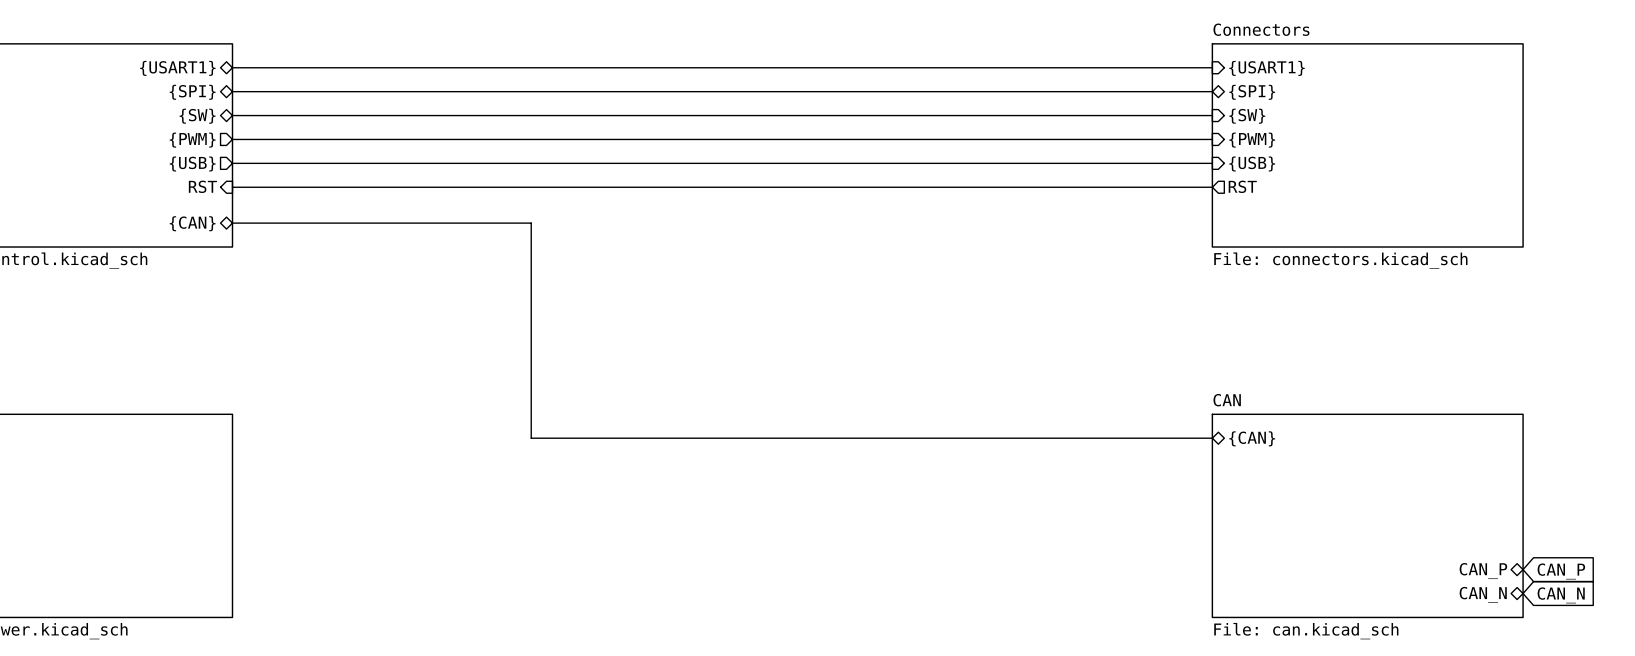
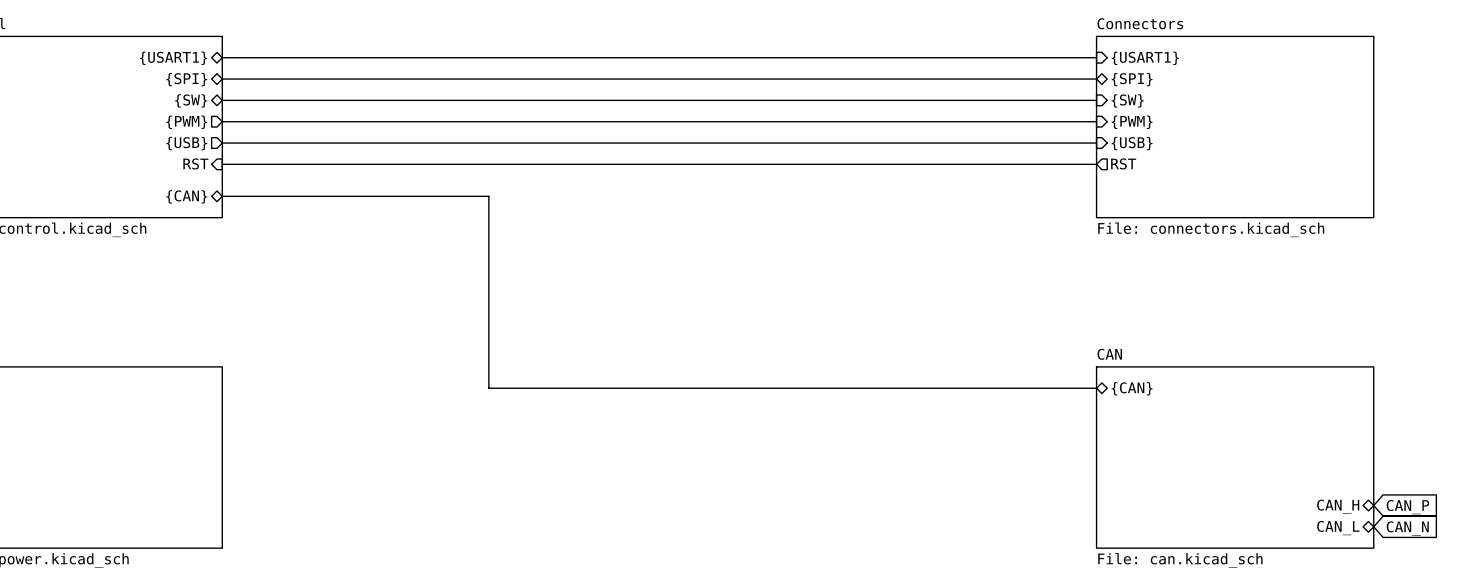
sheet pin: CAN_P (1483, 571) -> CAN_H (1338, 506)
sheet pin: CAN_N (1483, 594) -> CAN_L (1338, 528)

